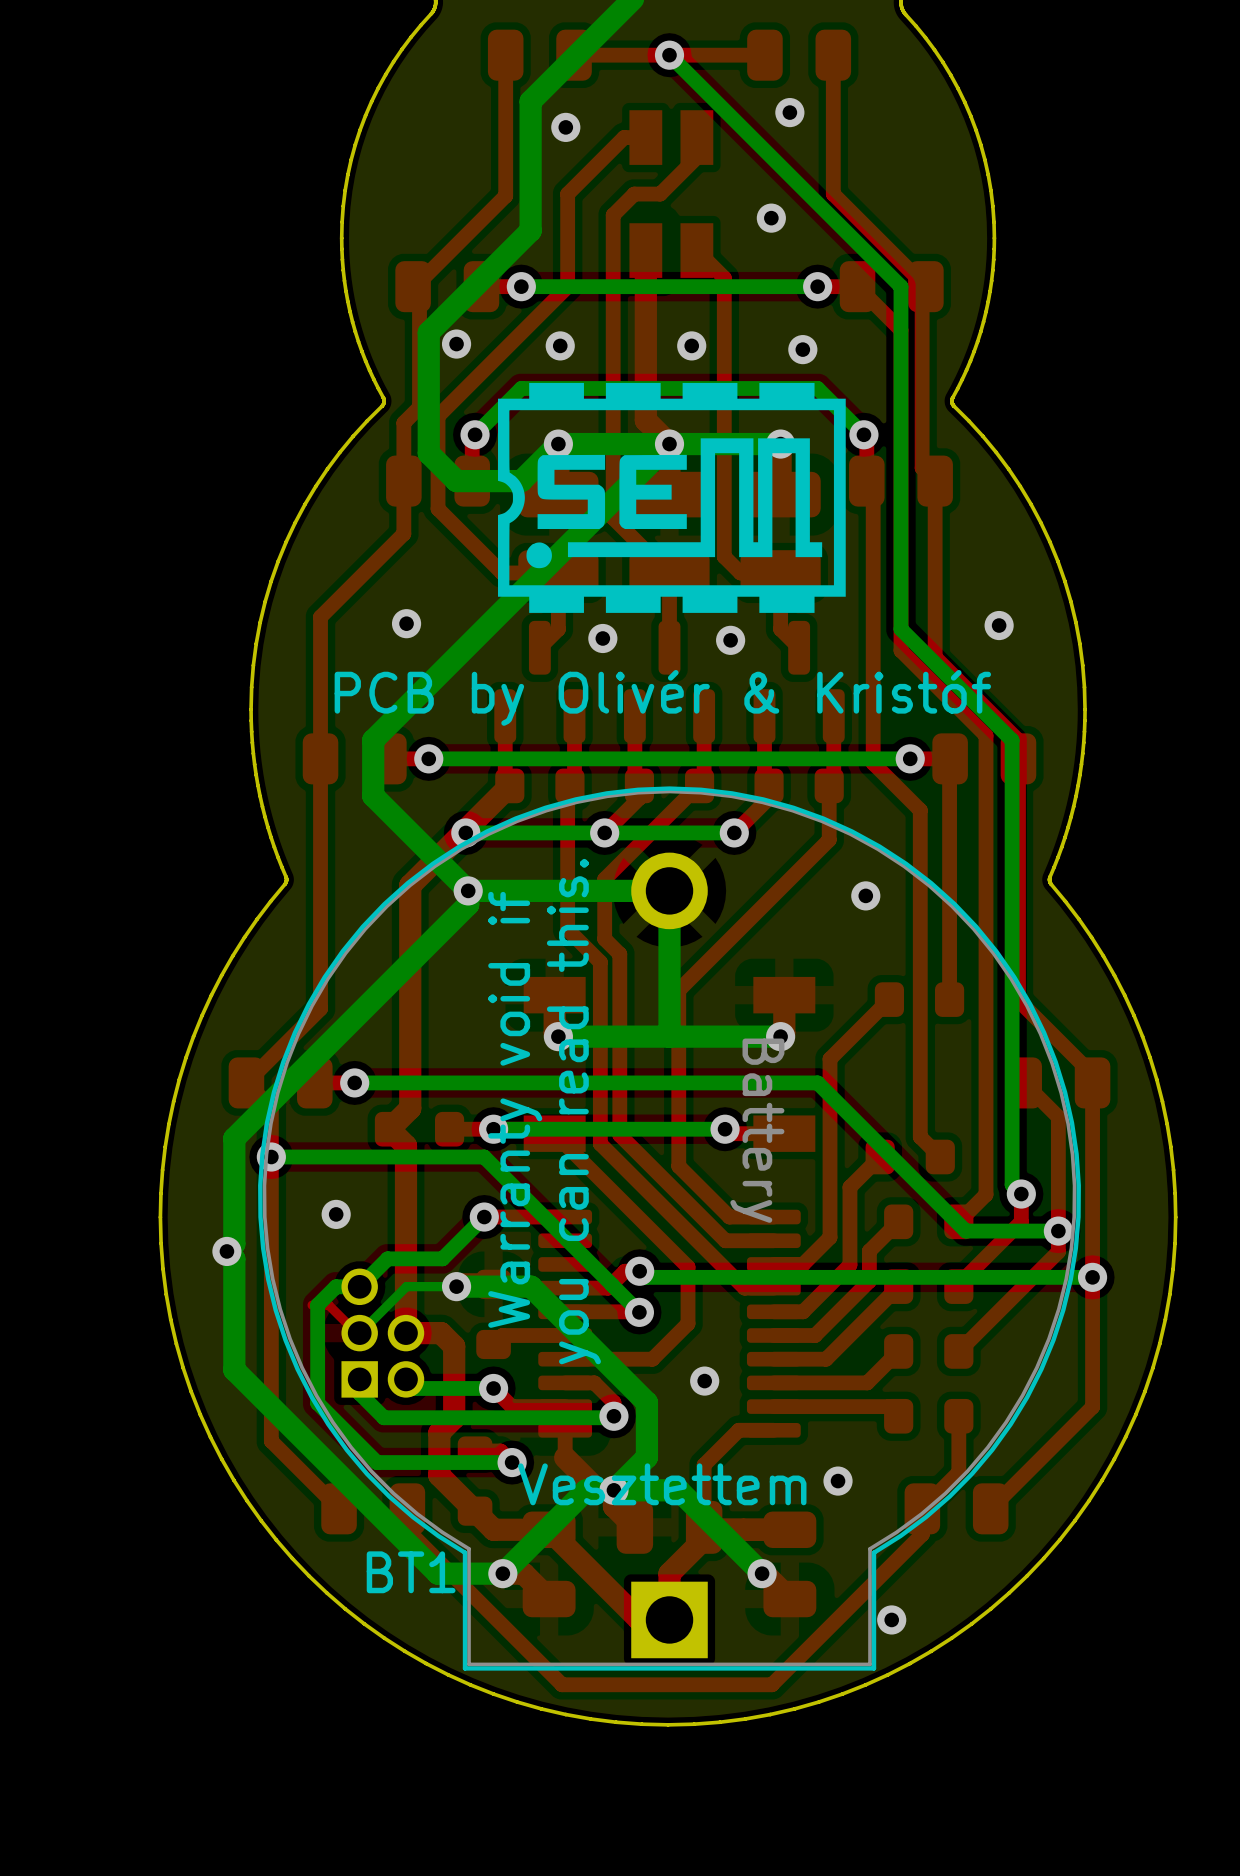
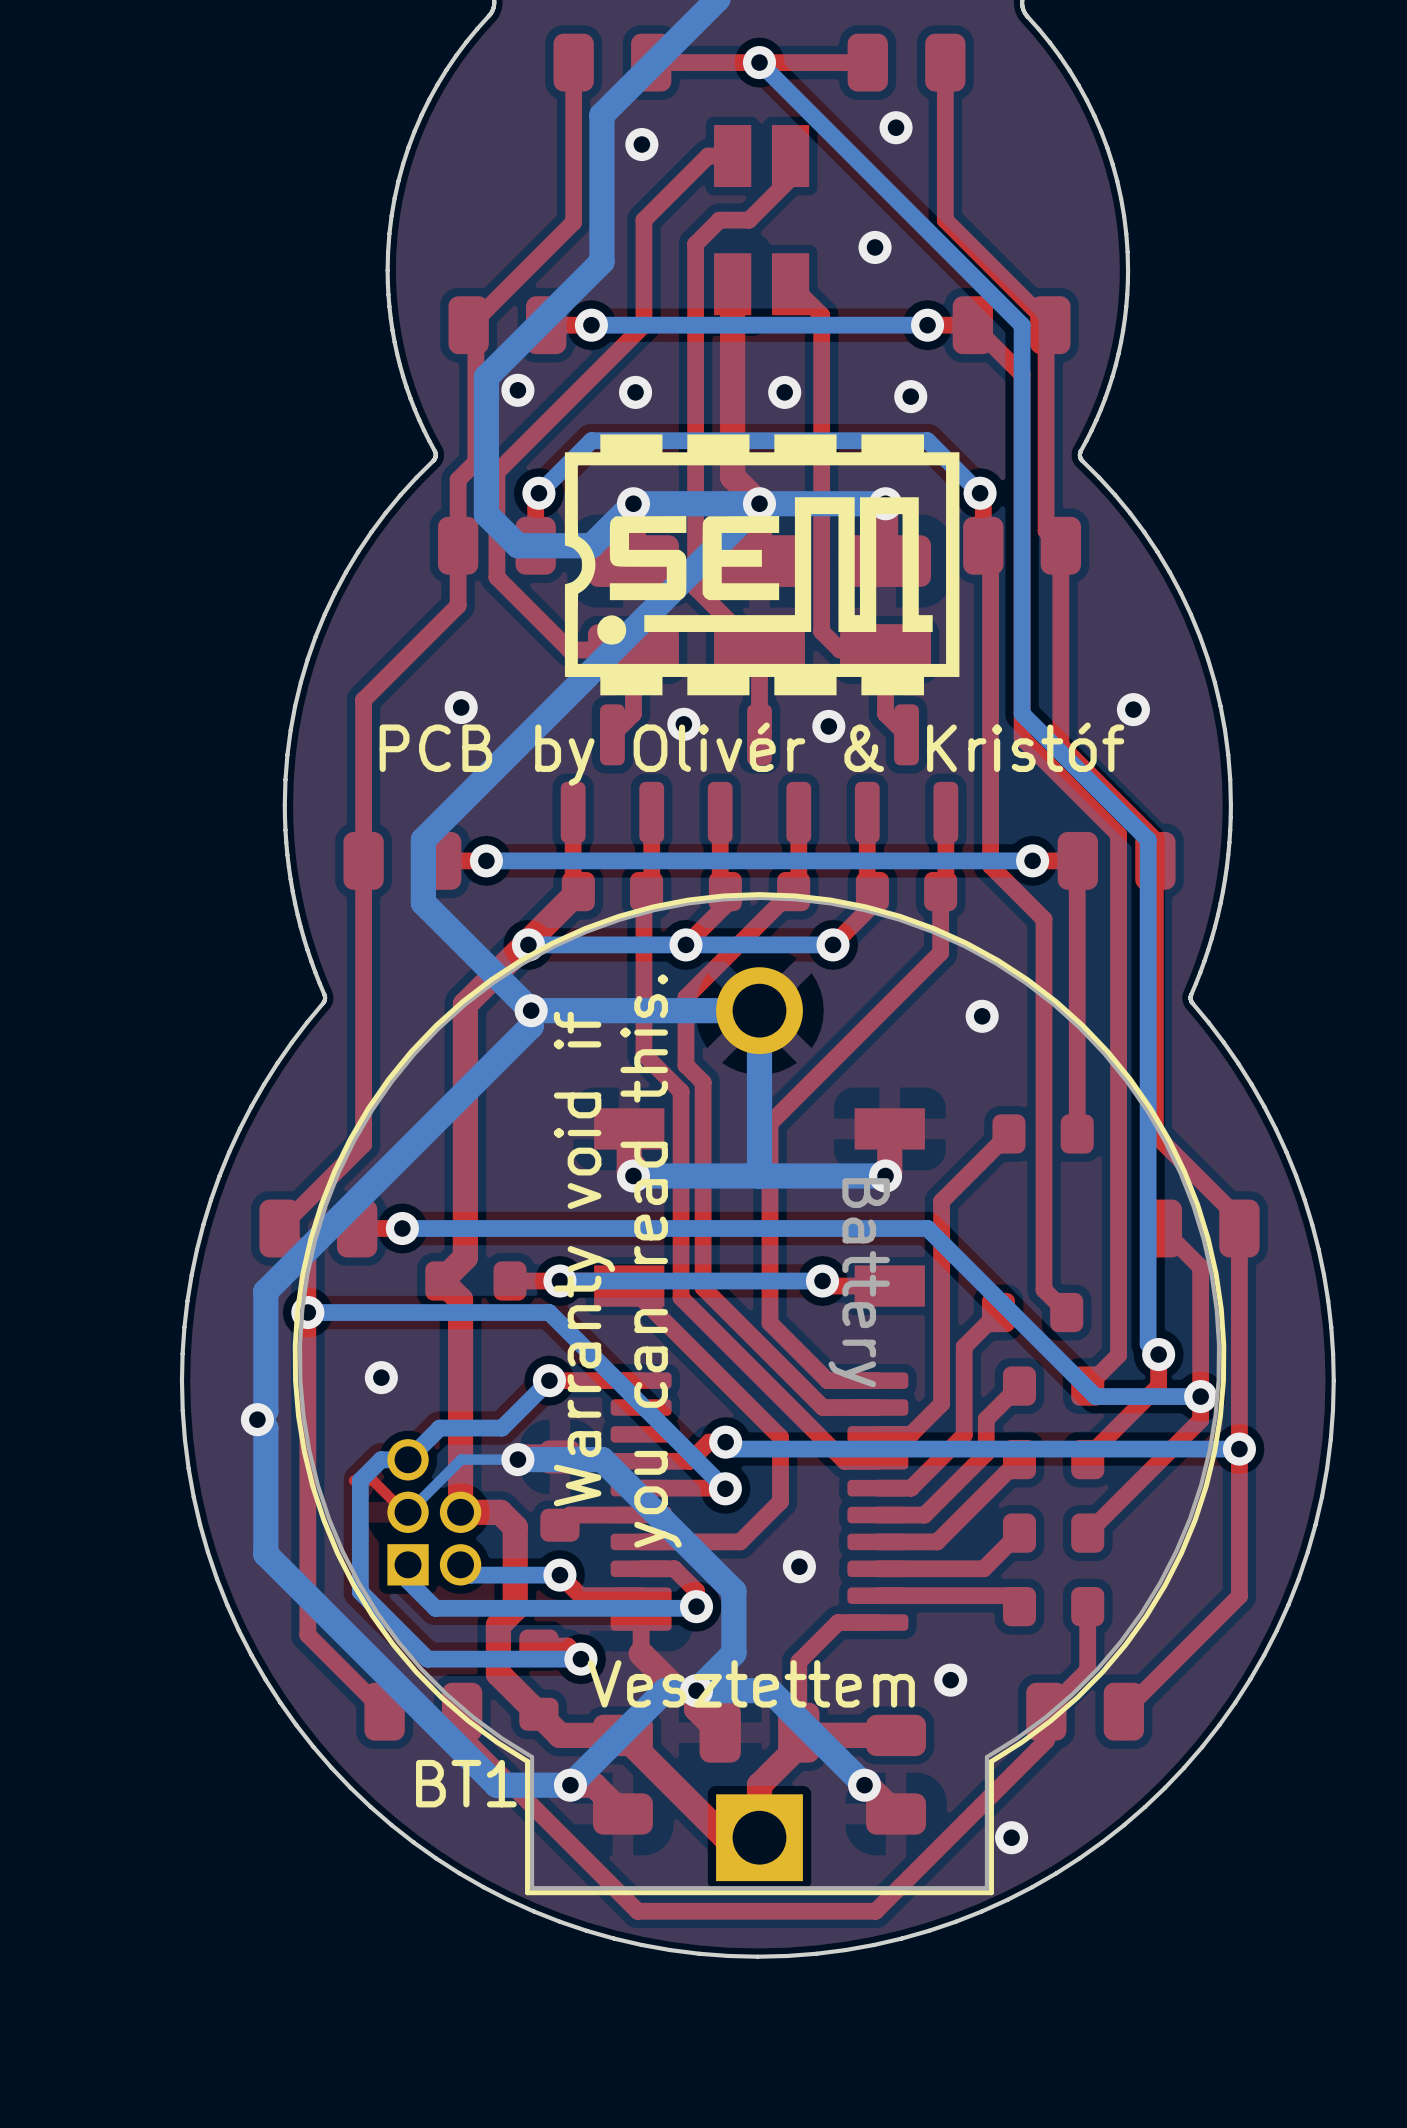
text position: PCB by Olivér & Kristóf (662, 697) -> PCB by Olivér & Kristóf (751, 754)

